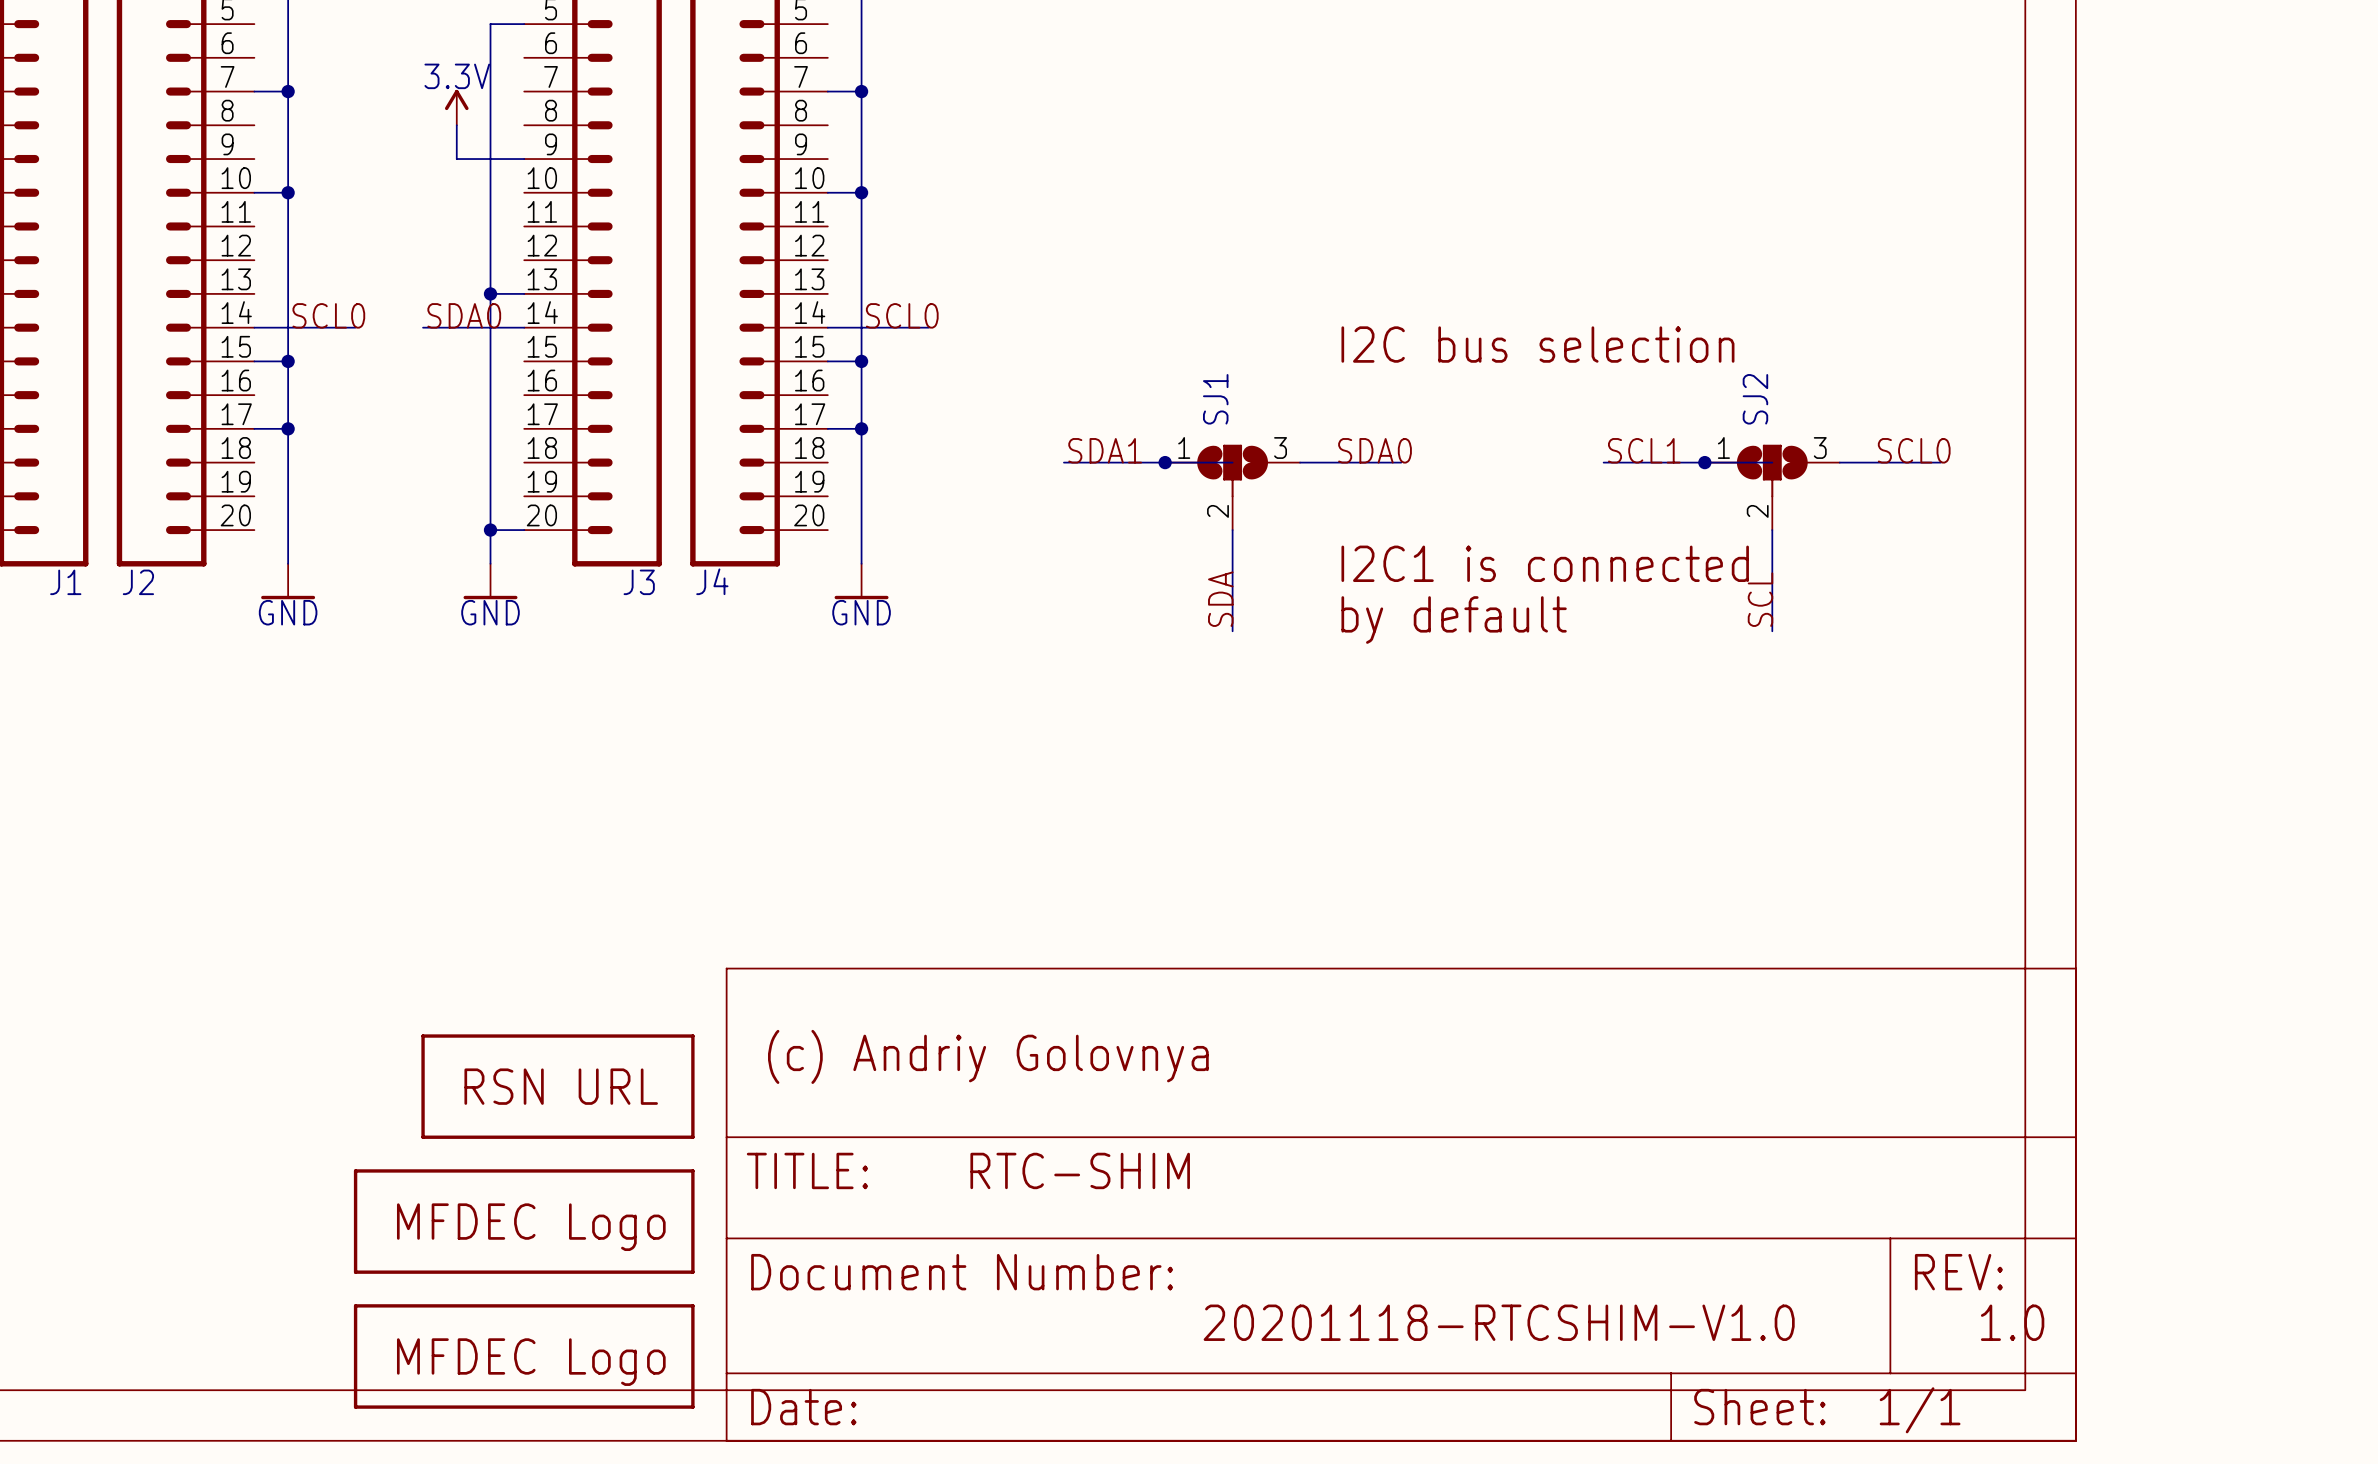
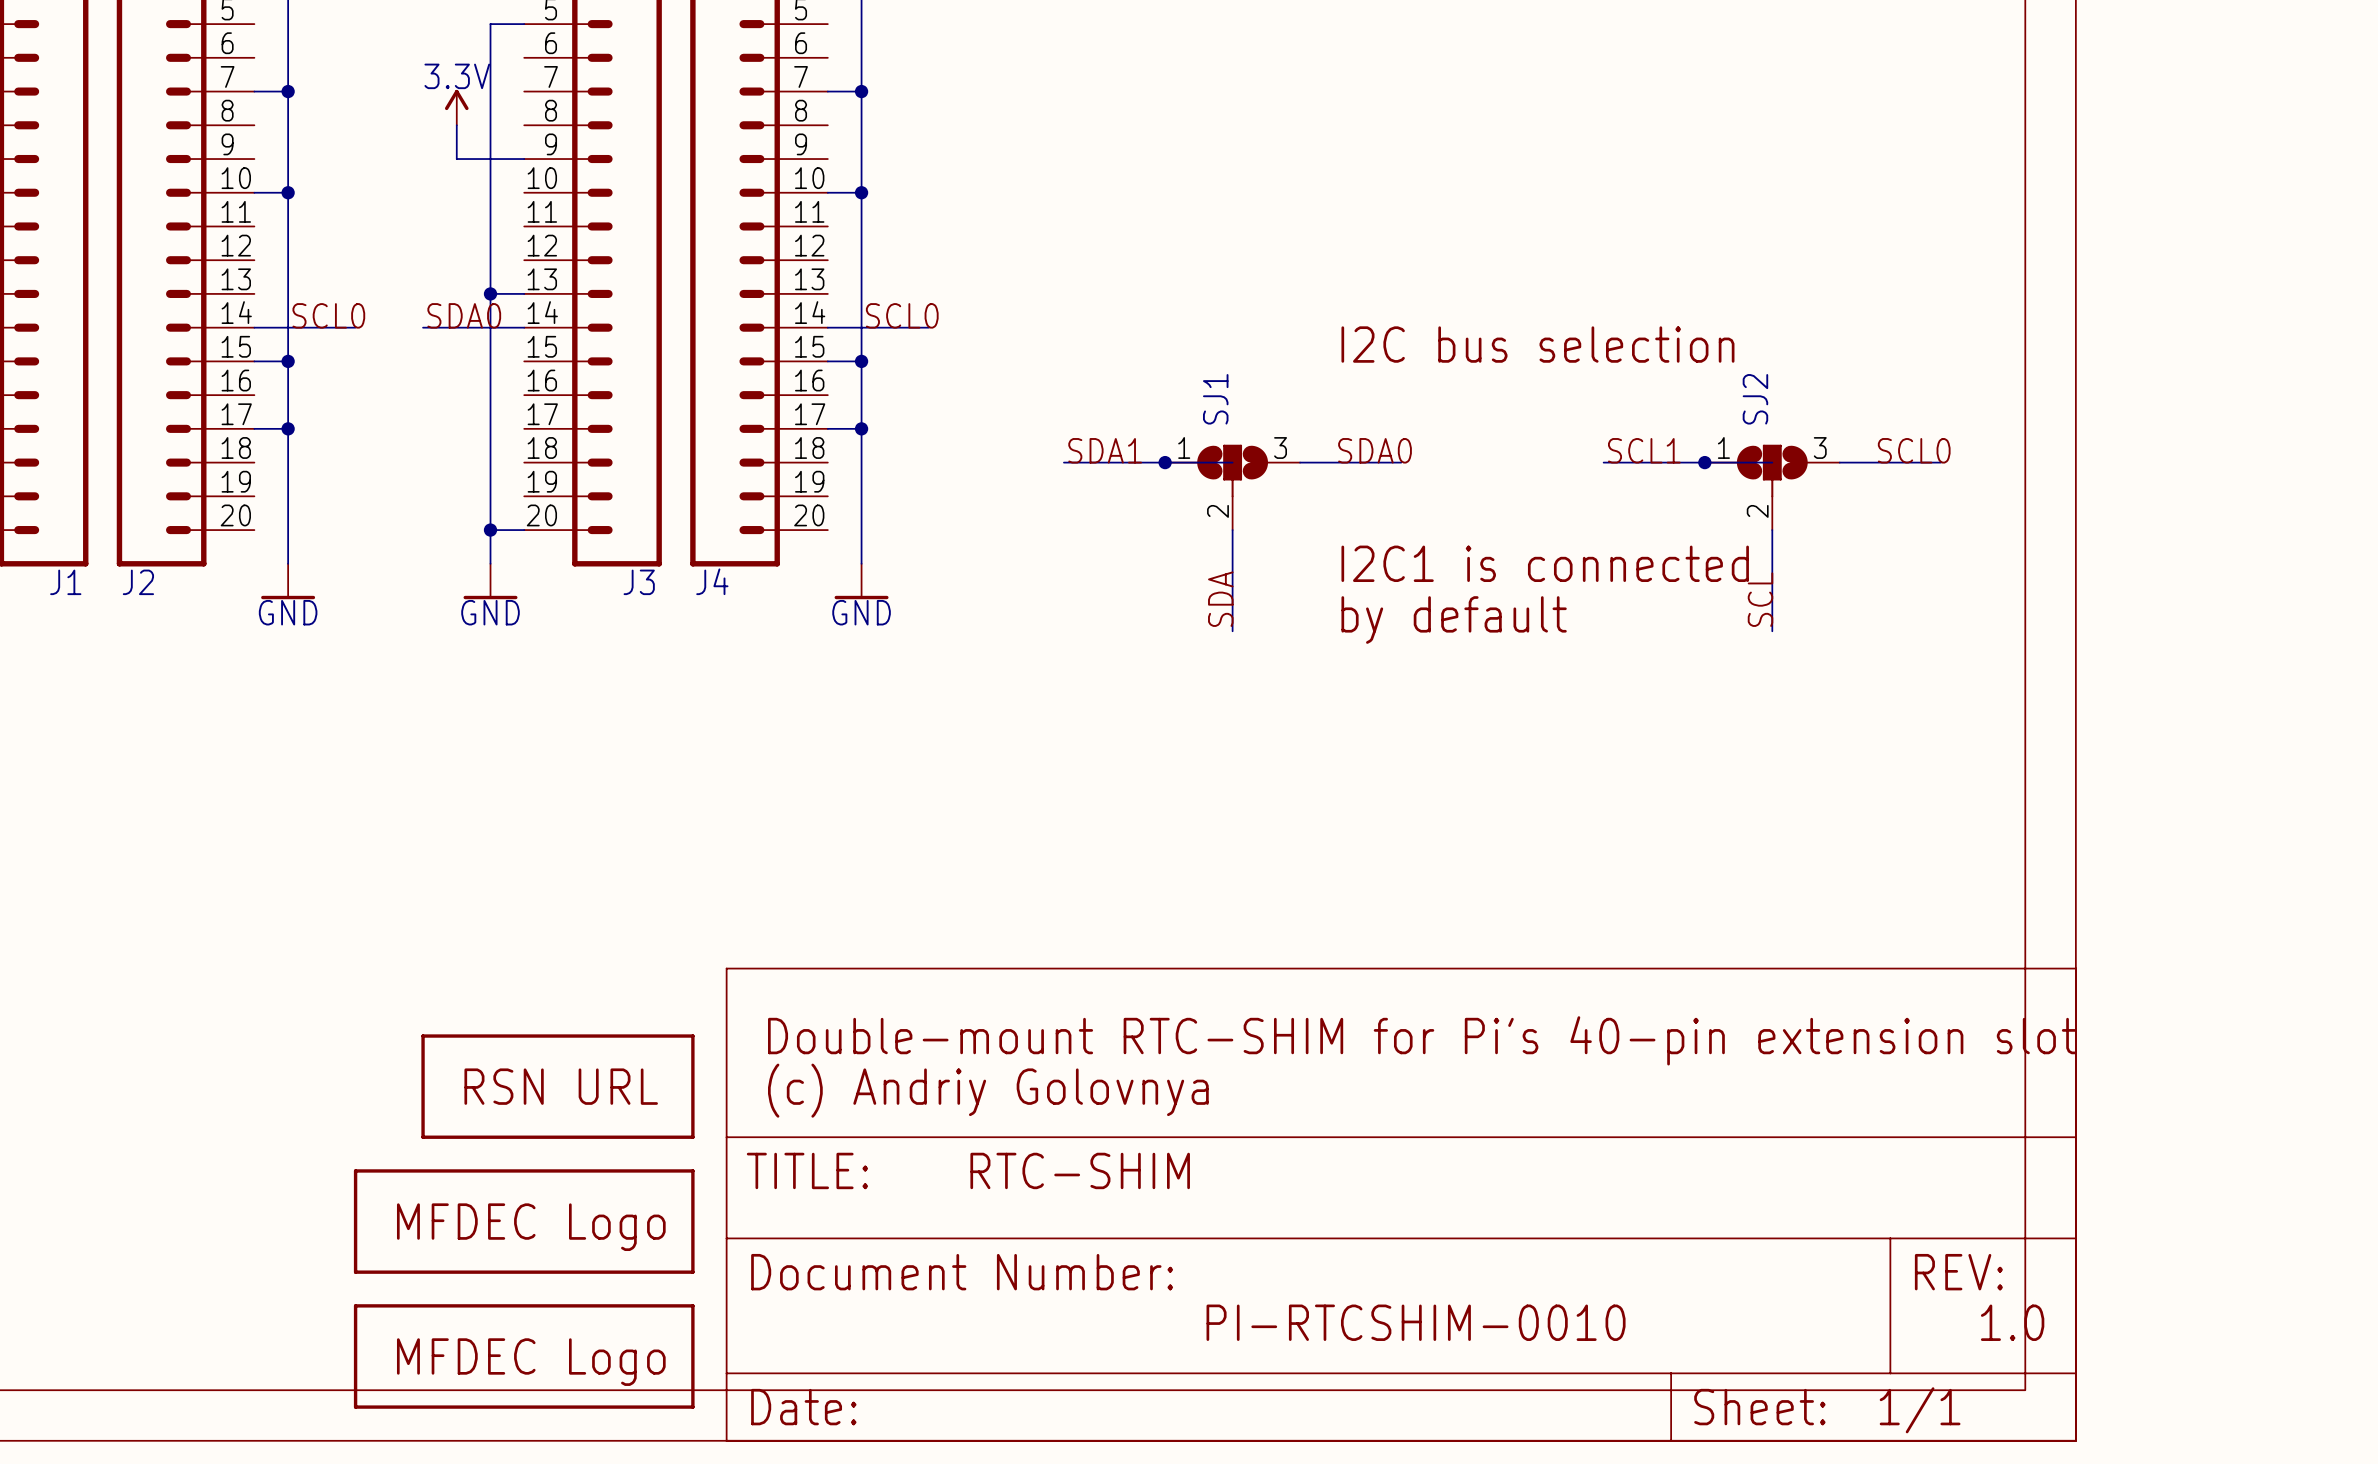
text: none -> Double-mount RTC-SHIM for Pi's 40-pin extension slot (1422, 1040)
text position: (c) Andriy Golovnya (988, 1056) -> (c) Andriy Golovnya (988, 1090)
text: 20201118-RTCSHIM-V1.0 (1499, 1322) -> PI-RTCSHIM-0010 (1416, 1322)

